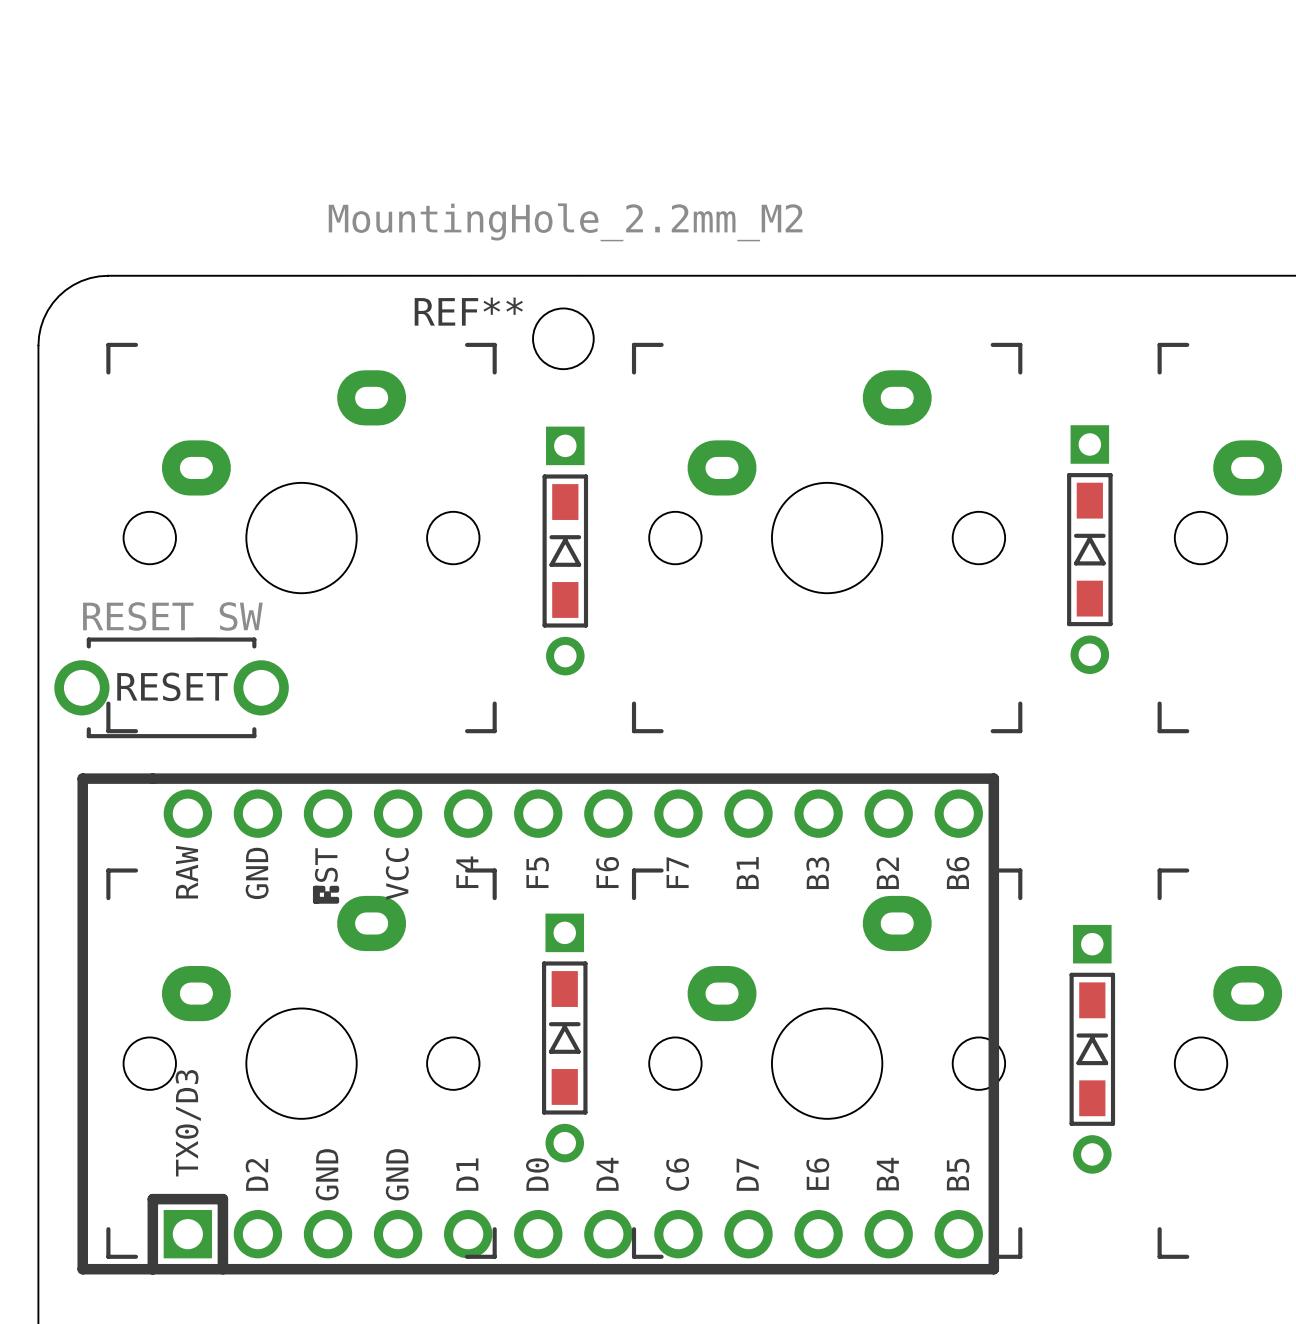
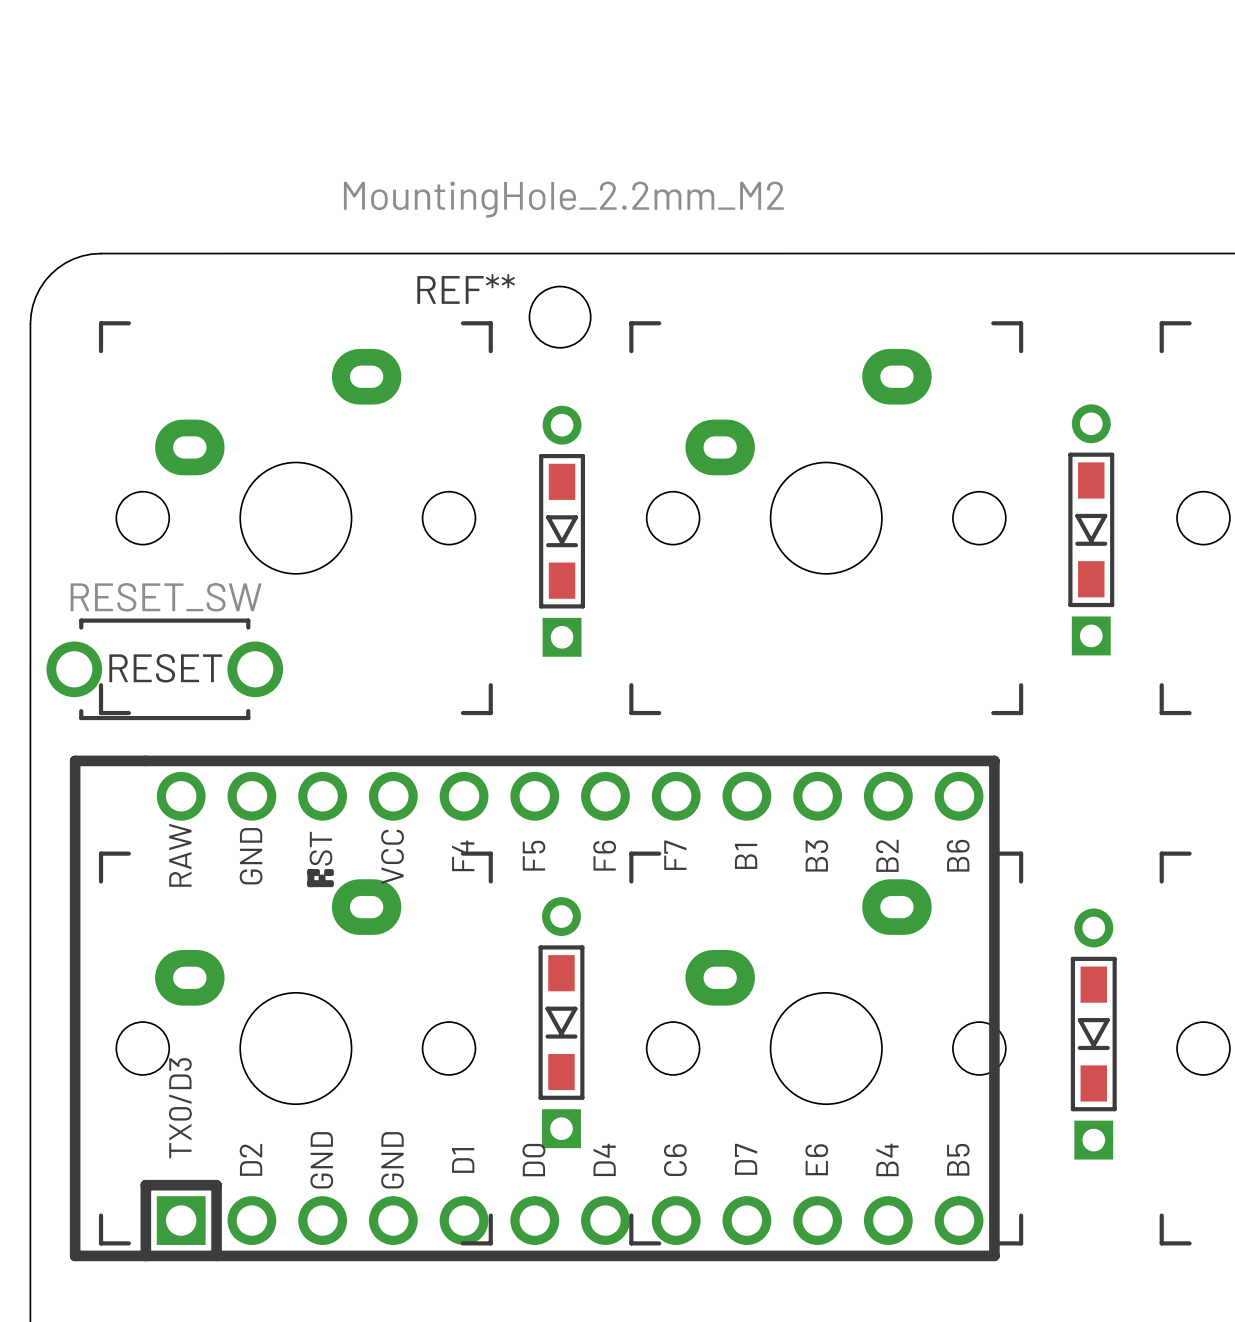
part rotation: 0° (1089, 549) -> 180° (1091, 529)
part rotation: 0° (565, 551) -> 180° (562, 531)
part rotation: 0° (564, 1037) -> 180° (561, 1022)
part rotation: 0° (1092, 1049) -> 180° (1093, 1034)

